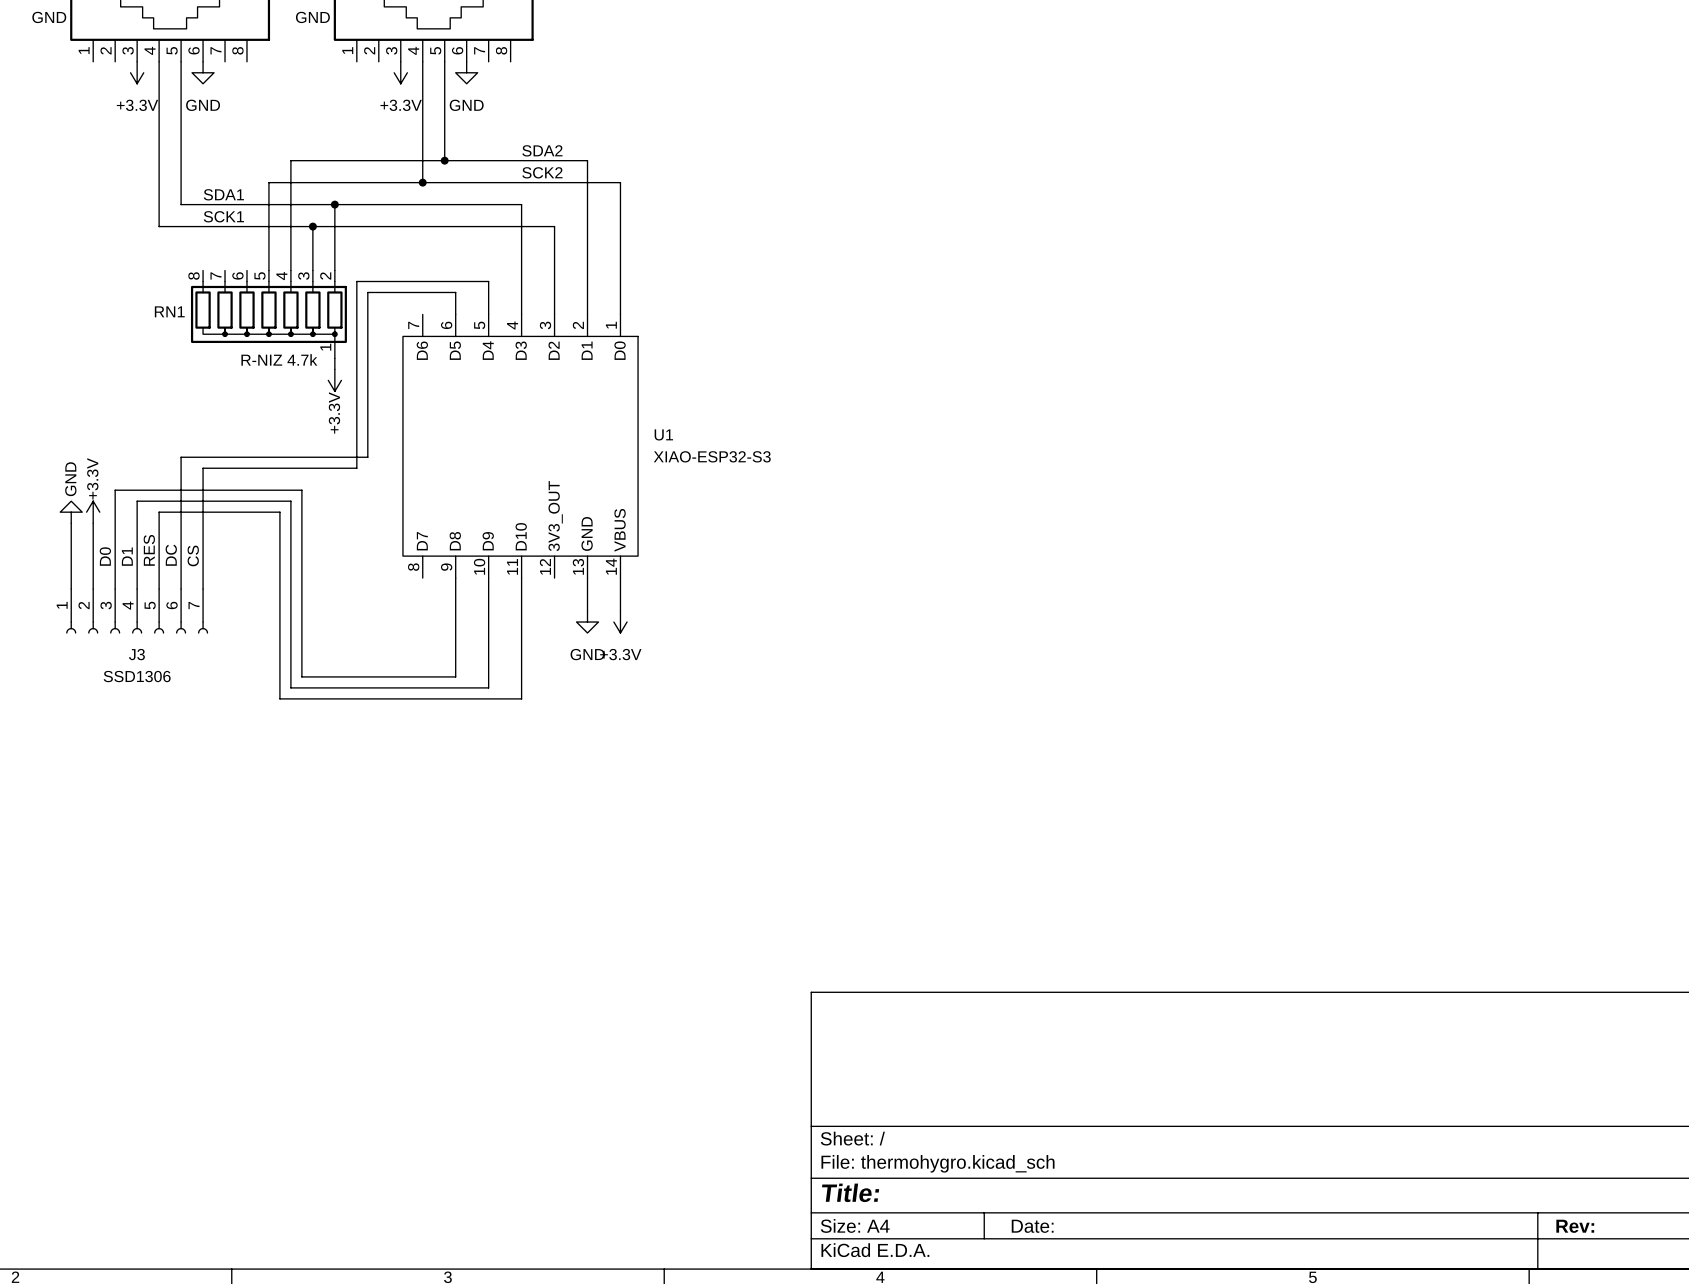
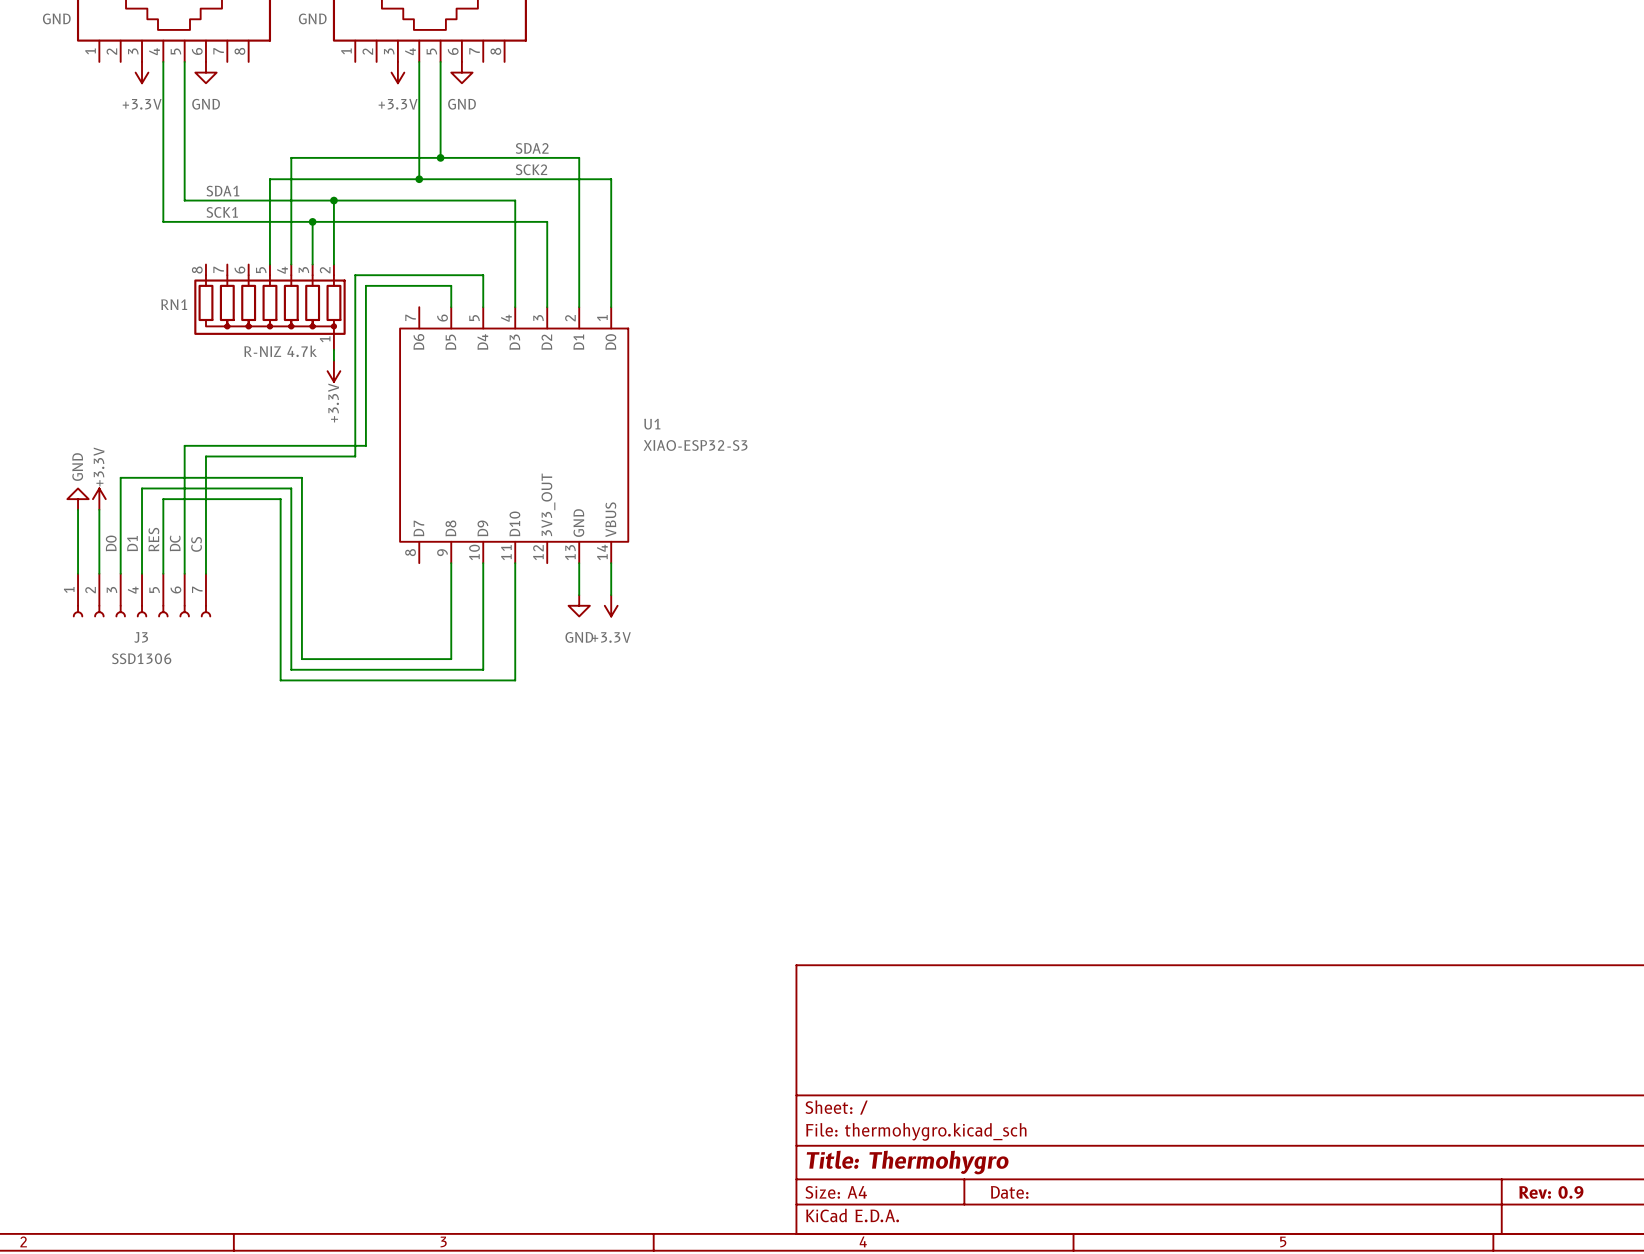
title block: Title: (850, 1192) -> Title: Thermohygro (907, 1162)
title block: Rev: (1575, 1226) -> Rev: 0.9 (1551, 1192)

